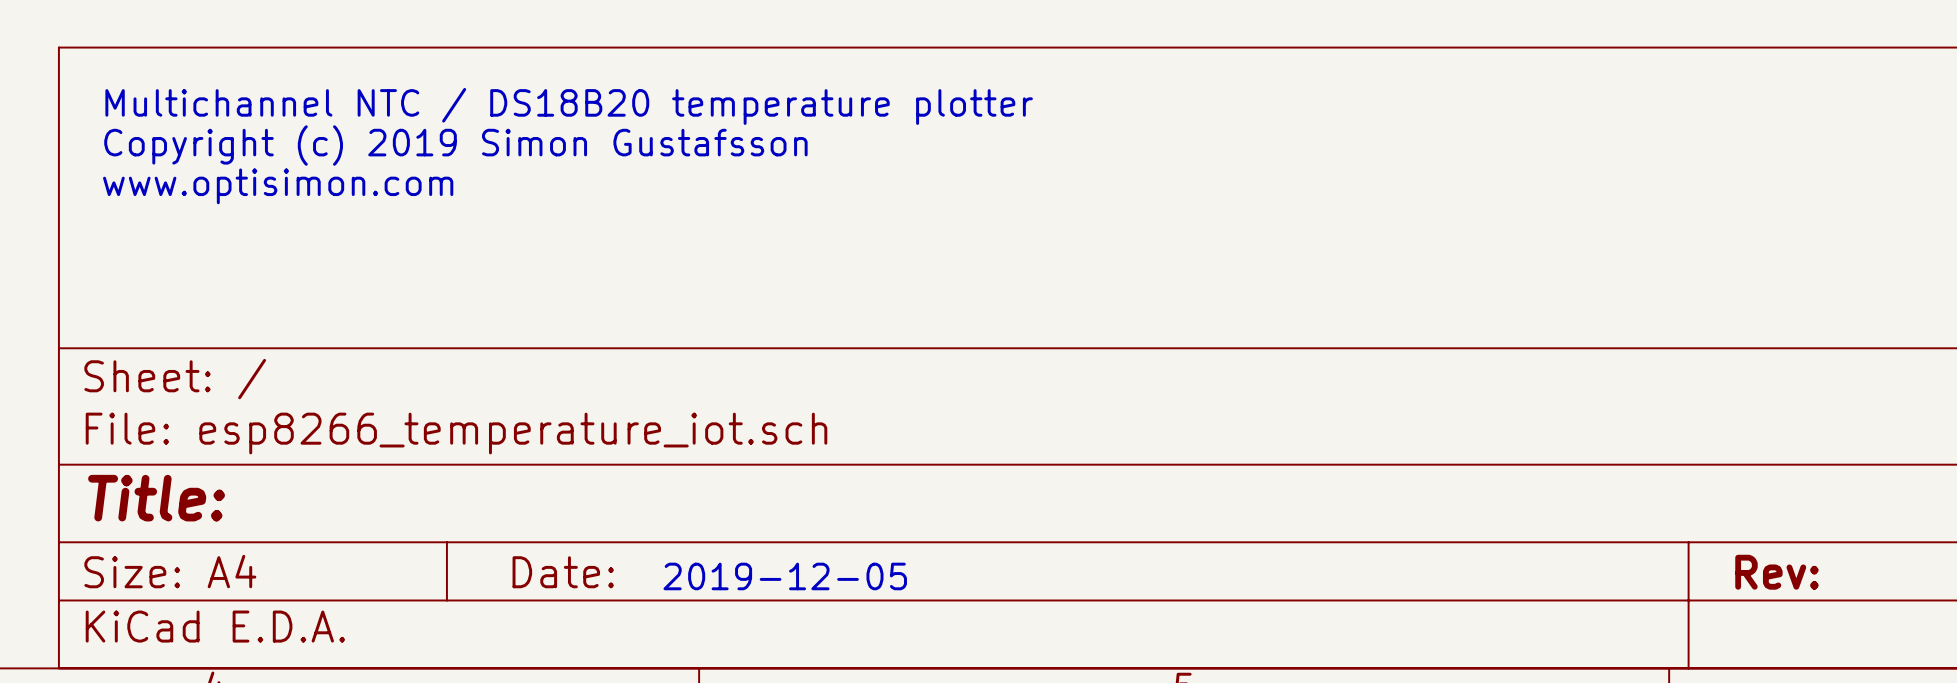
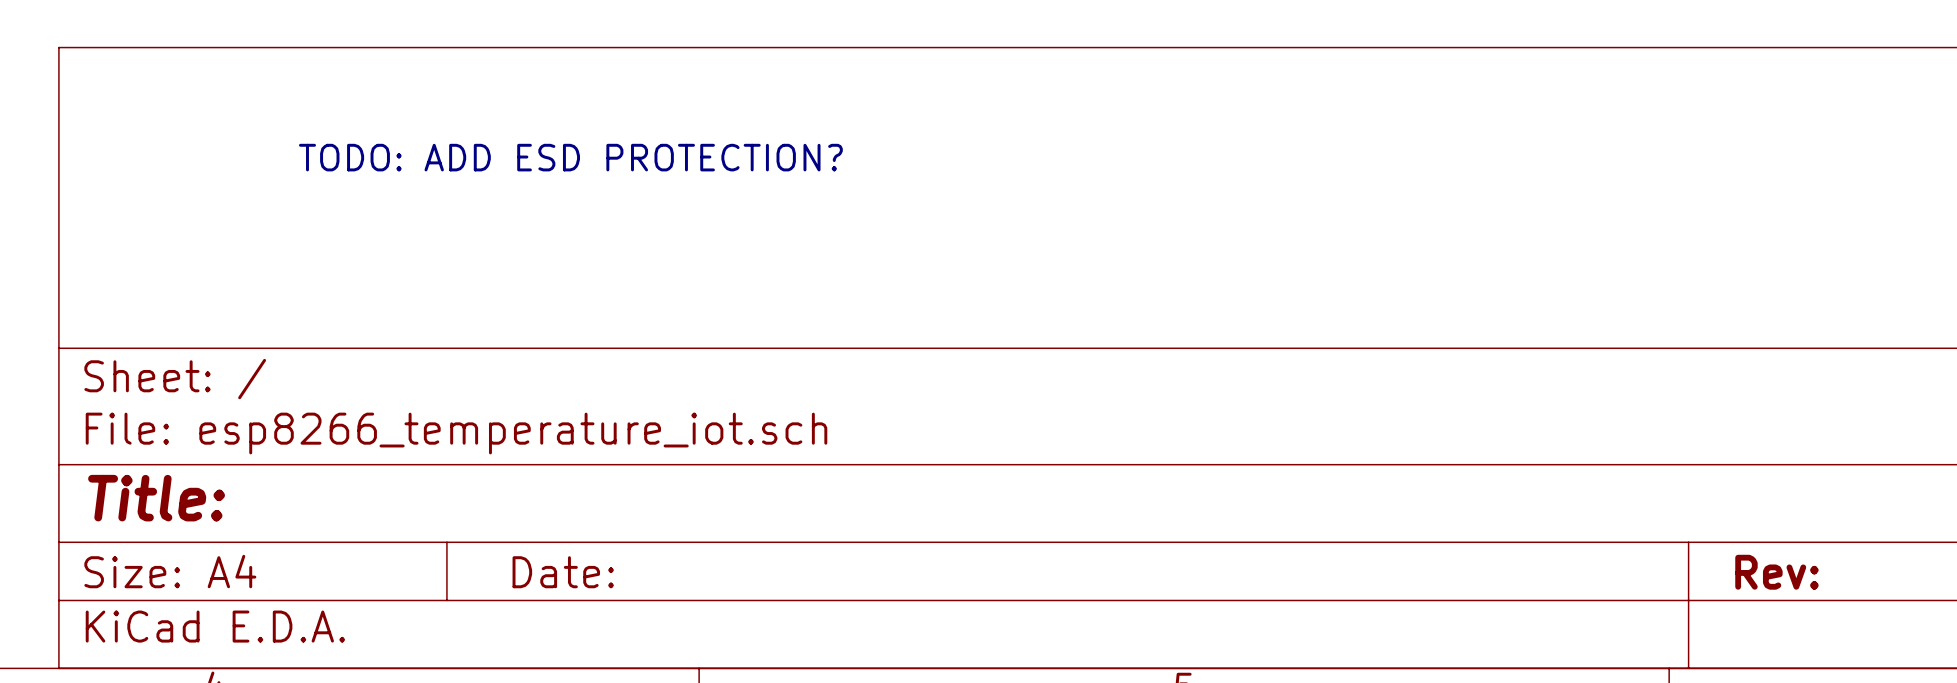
text: Multichannel NTC / DS18B20 temperature plotter (569, 106) -> none
text: Copyright (c) 2019 Simon Gustafsson (455, 145) -> none
text: none -> TODO: ADD ESD PROTECTION? (570, 157)
text: www.optisimon.com (278, 186) -> none
text: 2019-12-05 (785, 576) -> none

